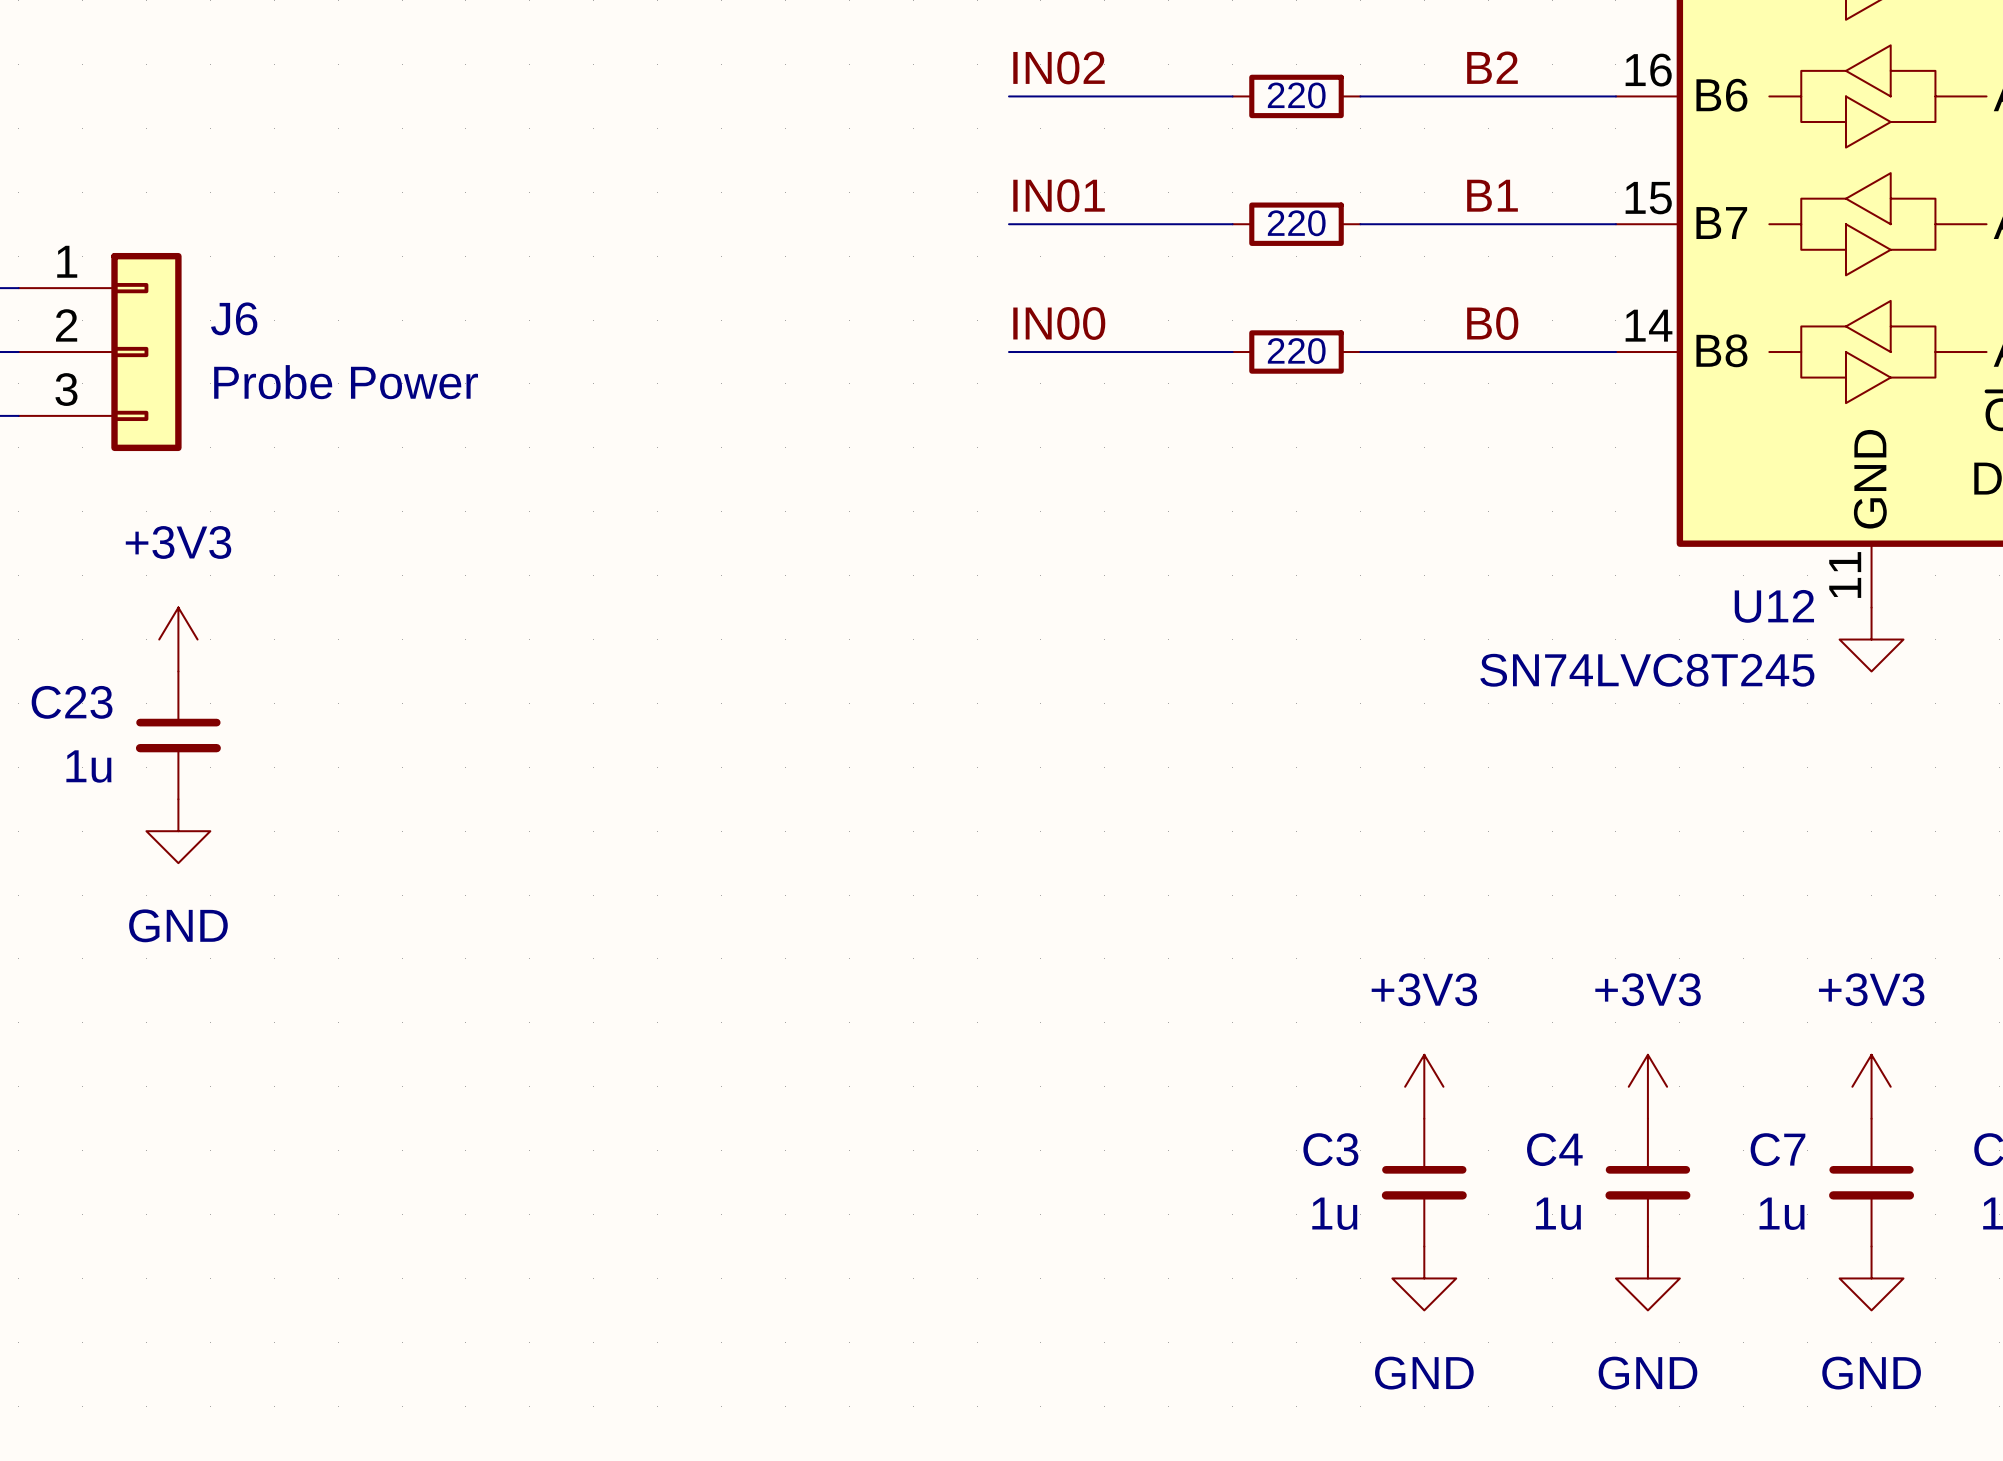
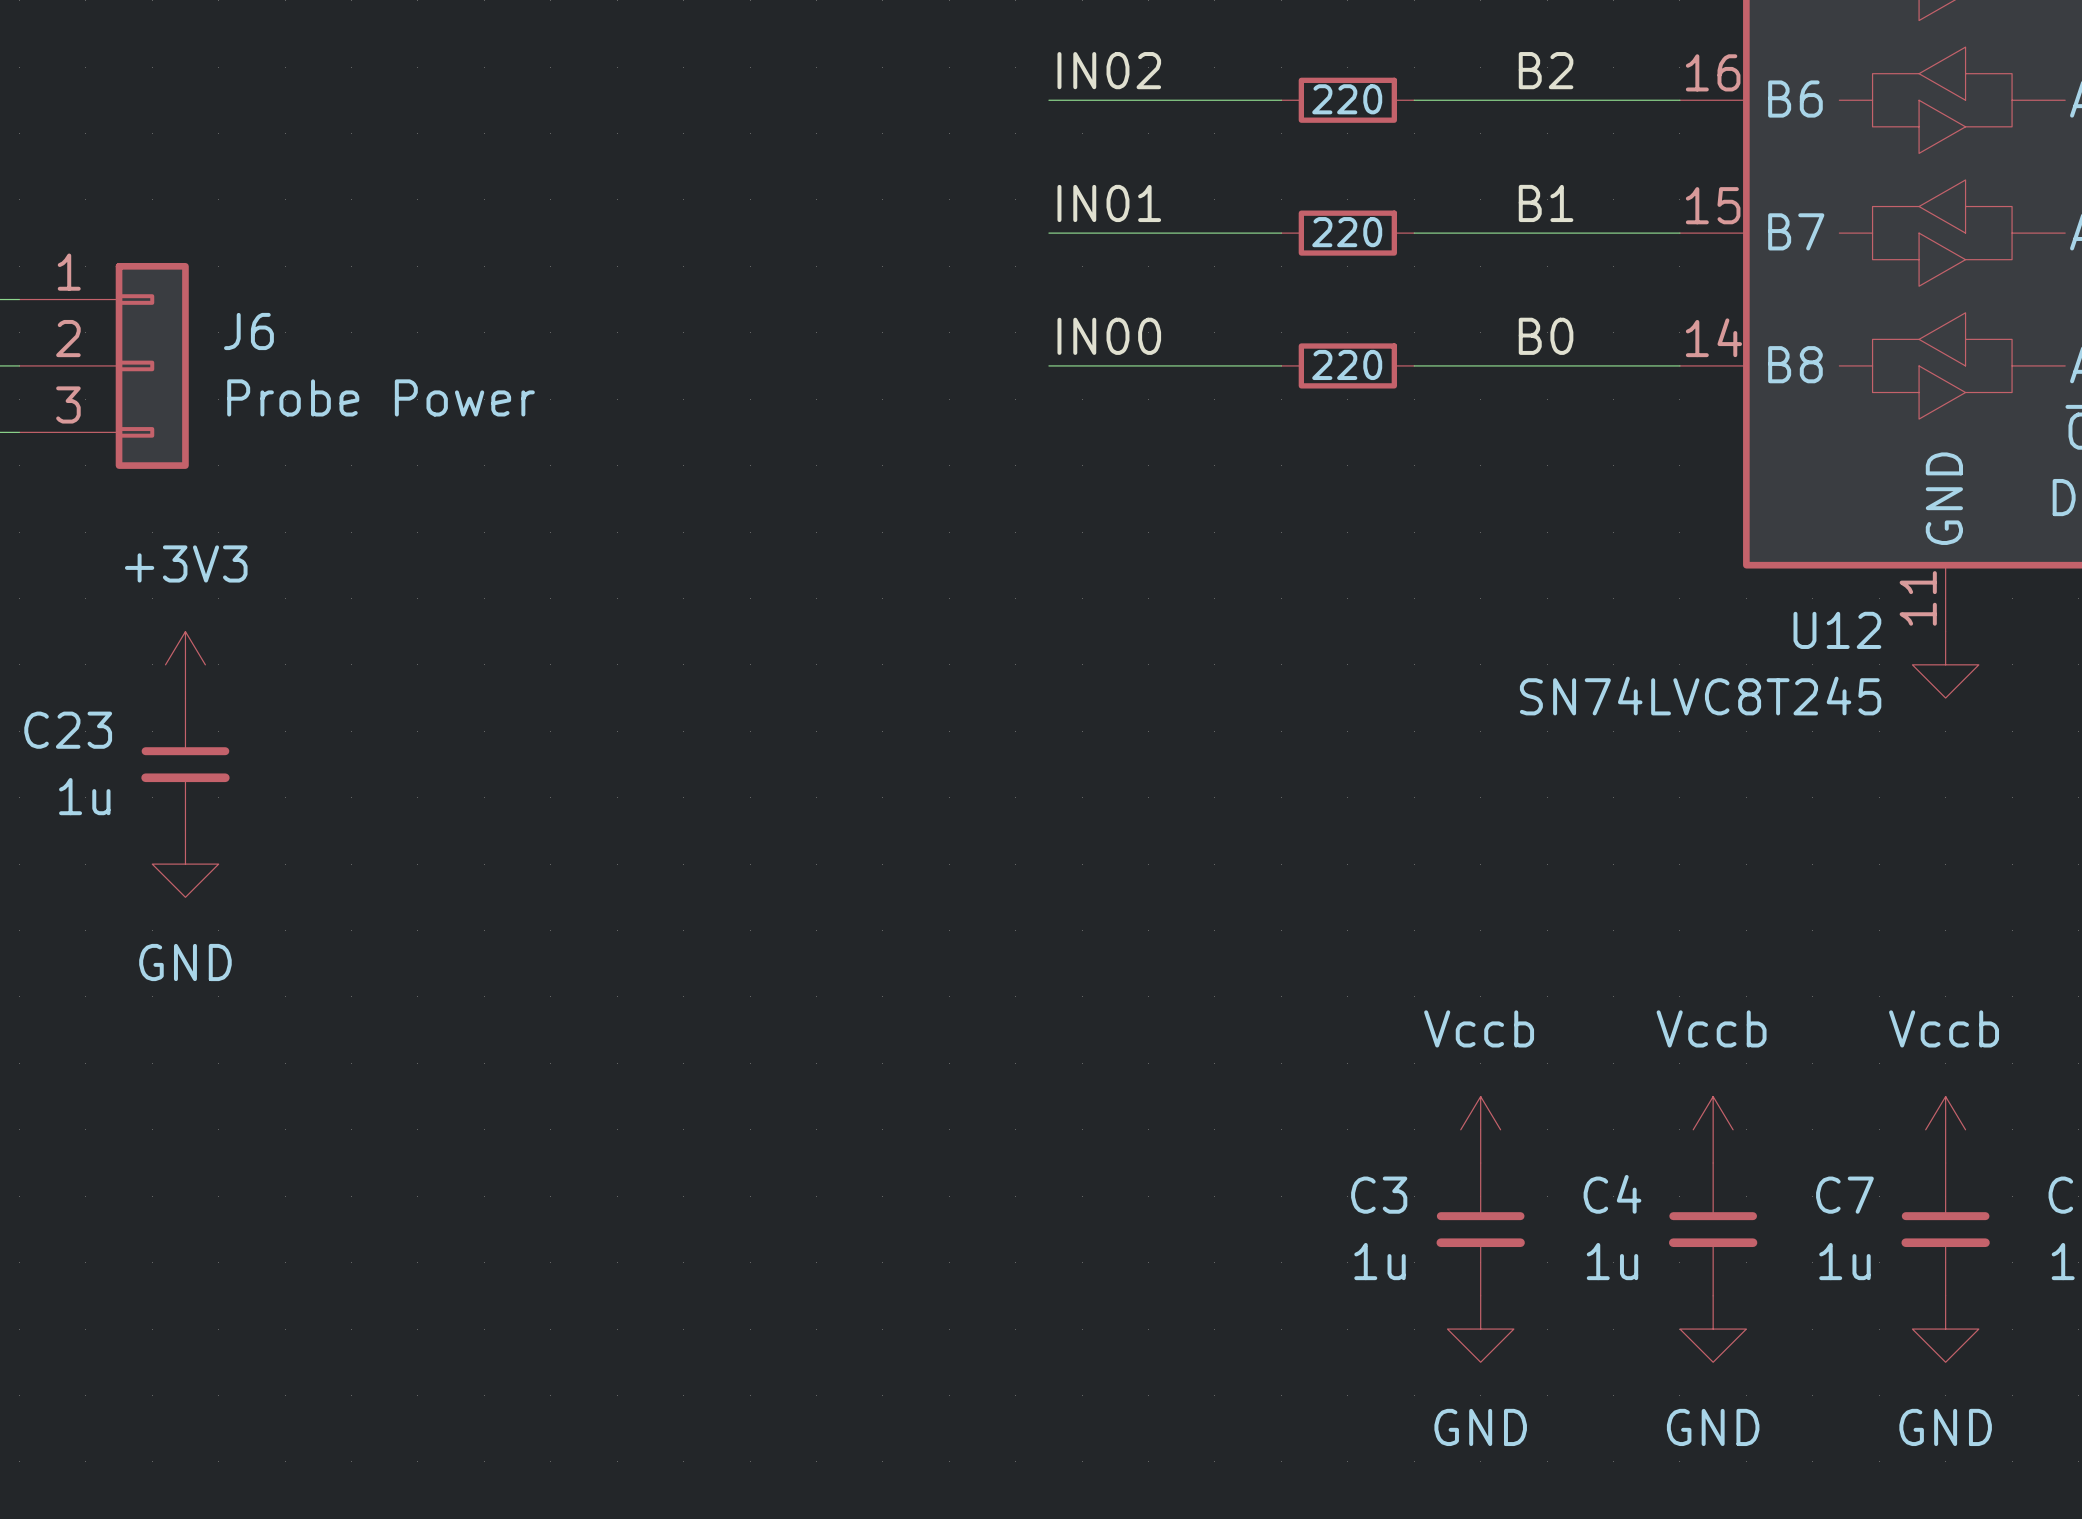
power symbol: +3V3 (1424, 1086) -> Vccb (1480, 1129)
power symbol: +3V3 (1647, 1086) -> Vccb (1713, 1129)
power symbol: +3V3 (1871, 1086) -> Vccb (1945, 1129)

